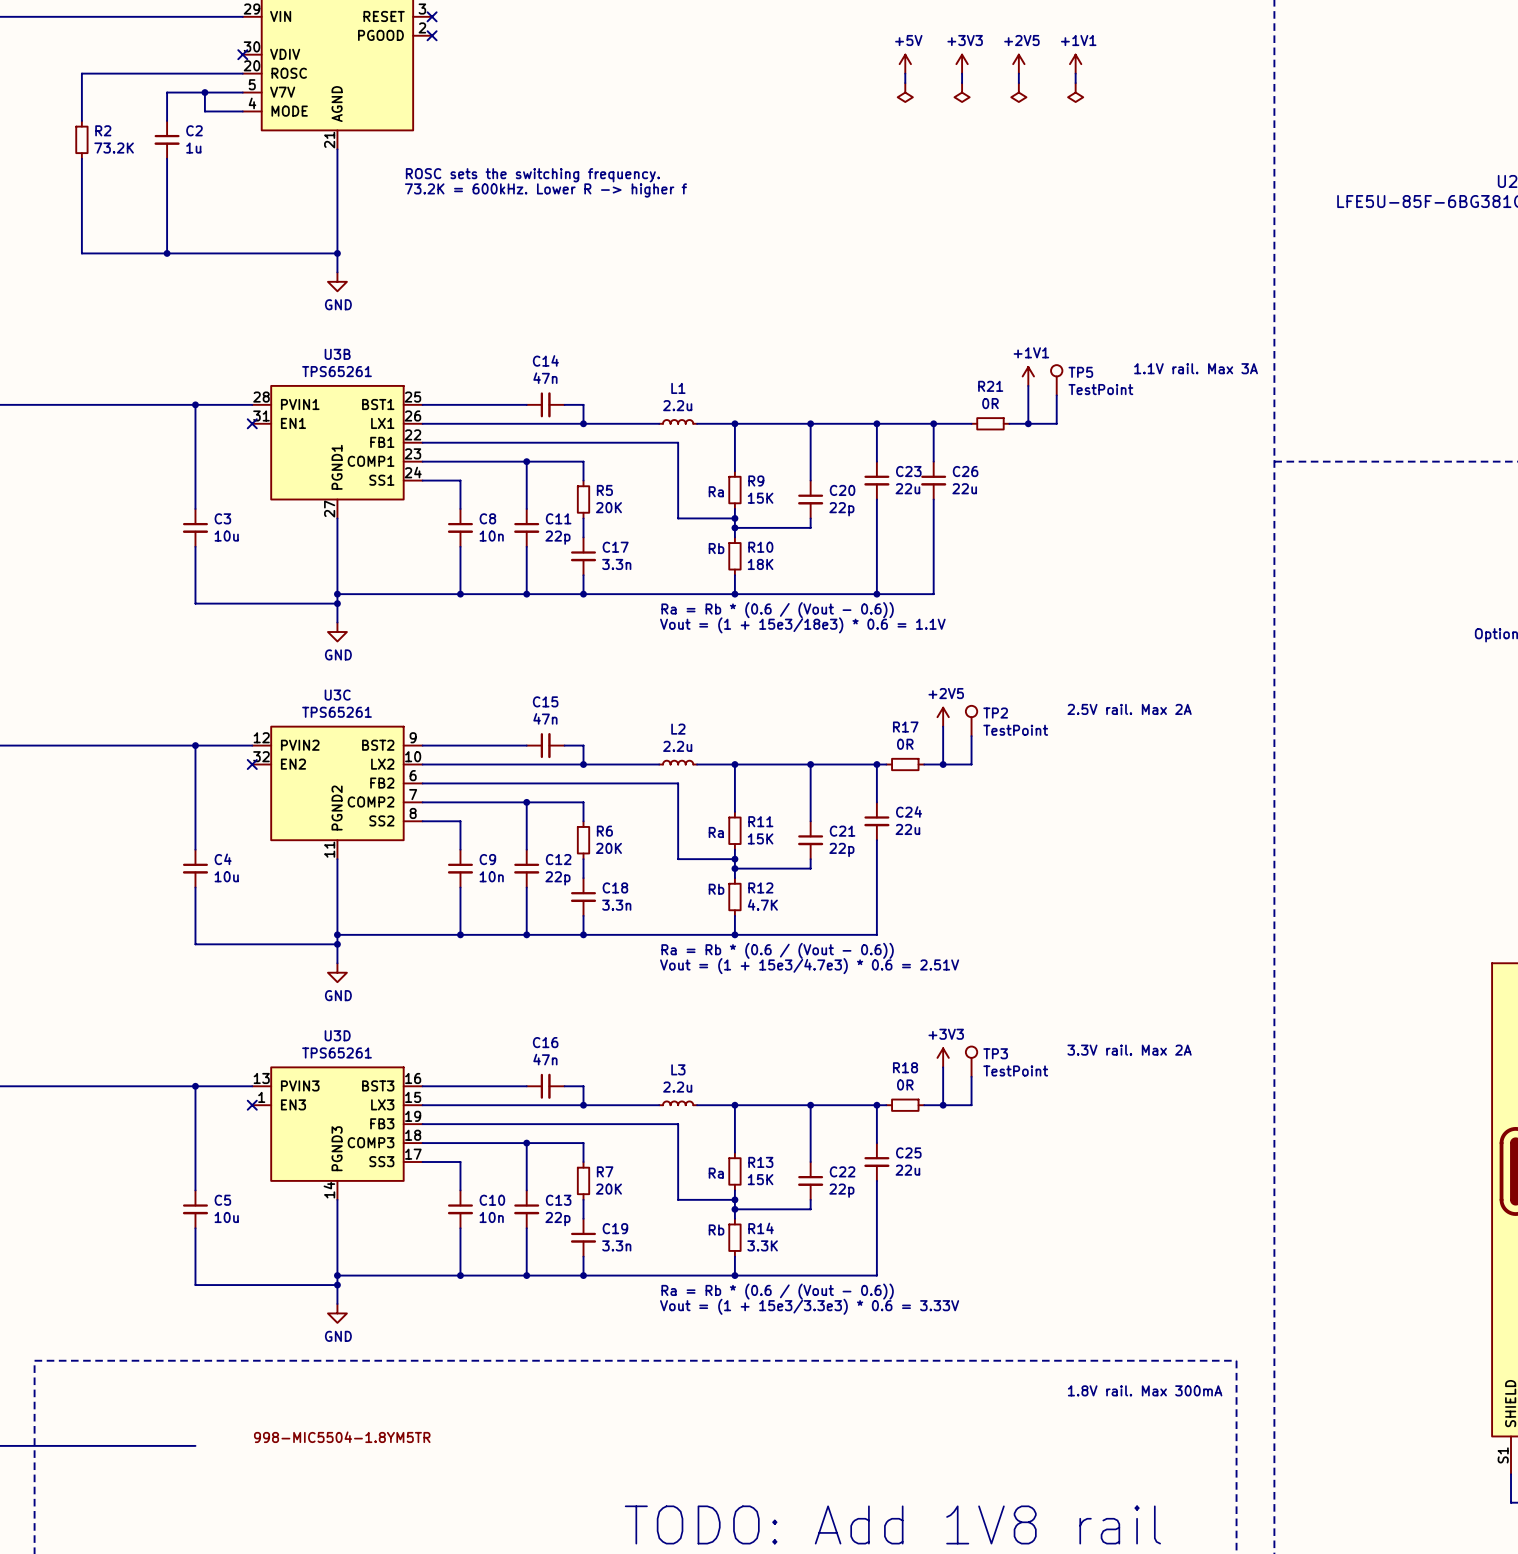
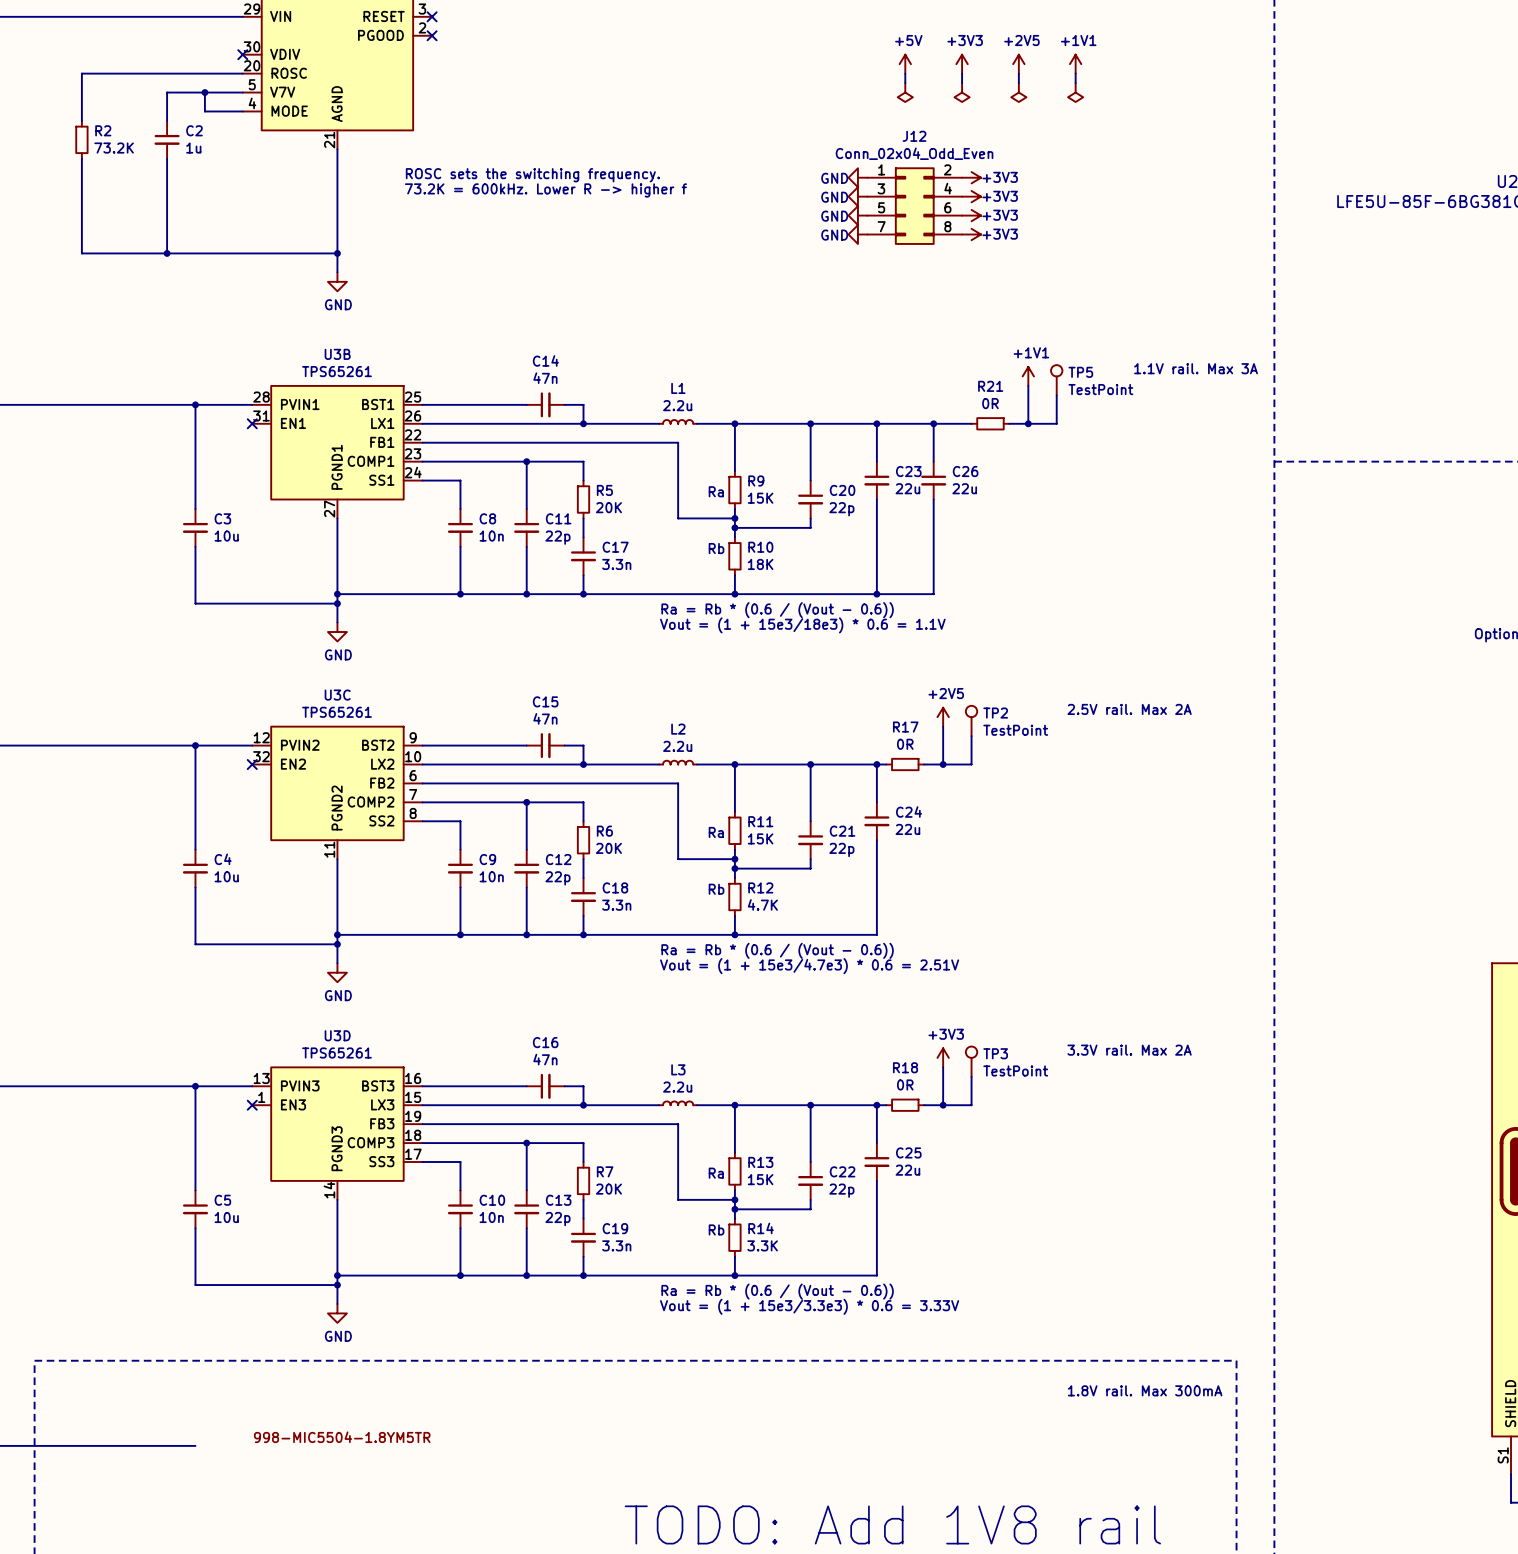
power symbol: none -> GND (857, 177)
power symbol: none -> +3V3 (971, 177)
power symbol: none -> GND (857, 196)
power symbol: none -> +3V3 (971, 196)
J12: none -> Conn_02x04_Odd_Even (914, 206)
power symbol: none -> GND (857, 215)
power symbol: none -> +3V3 (971, 215)
power symbol: none -> GND (857, 234)
power symbol: none -> +3V3 (971, 234)

